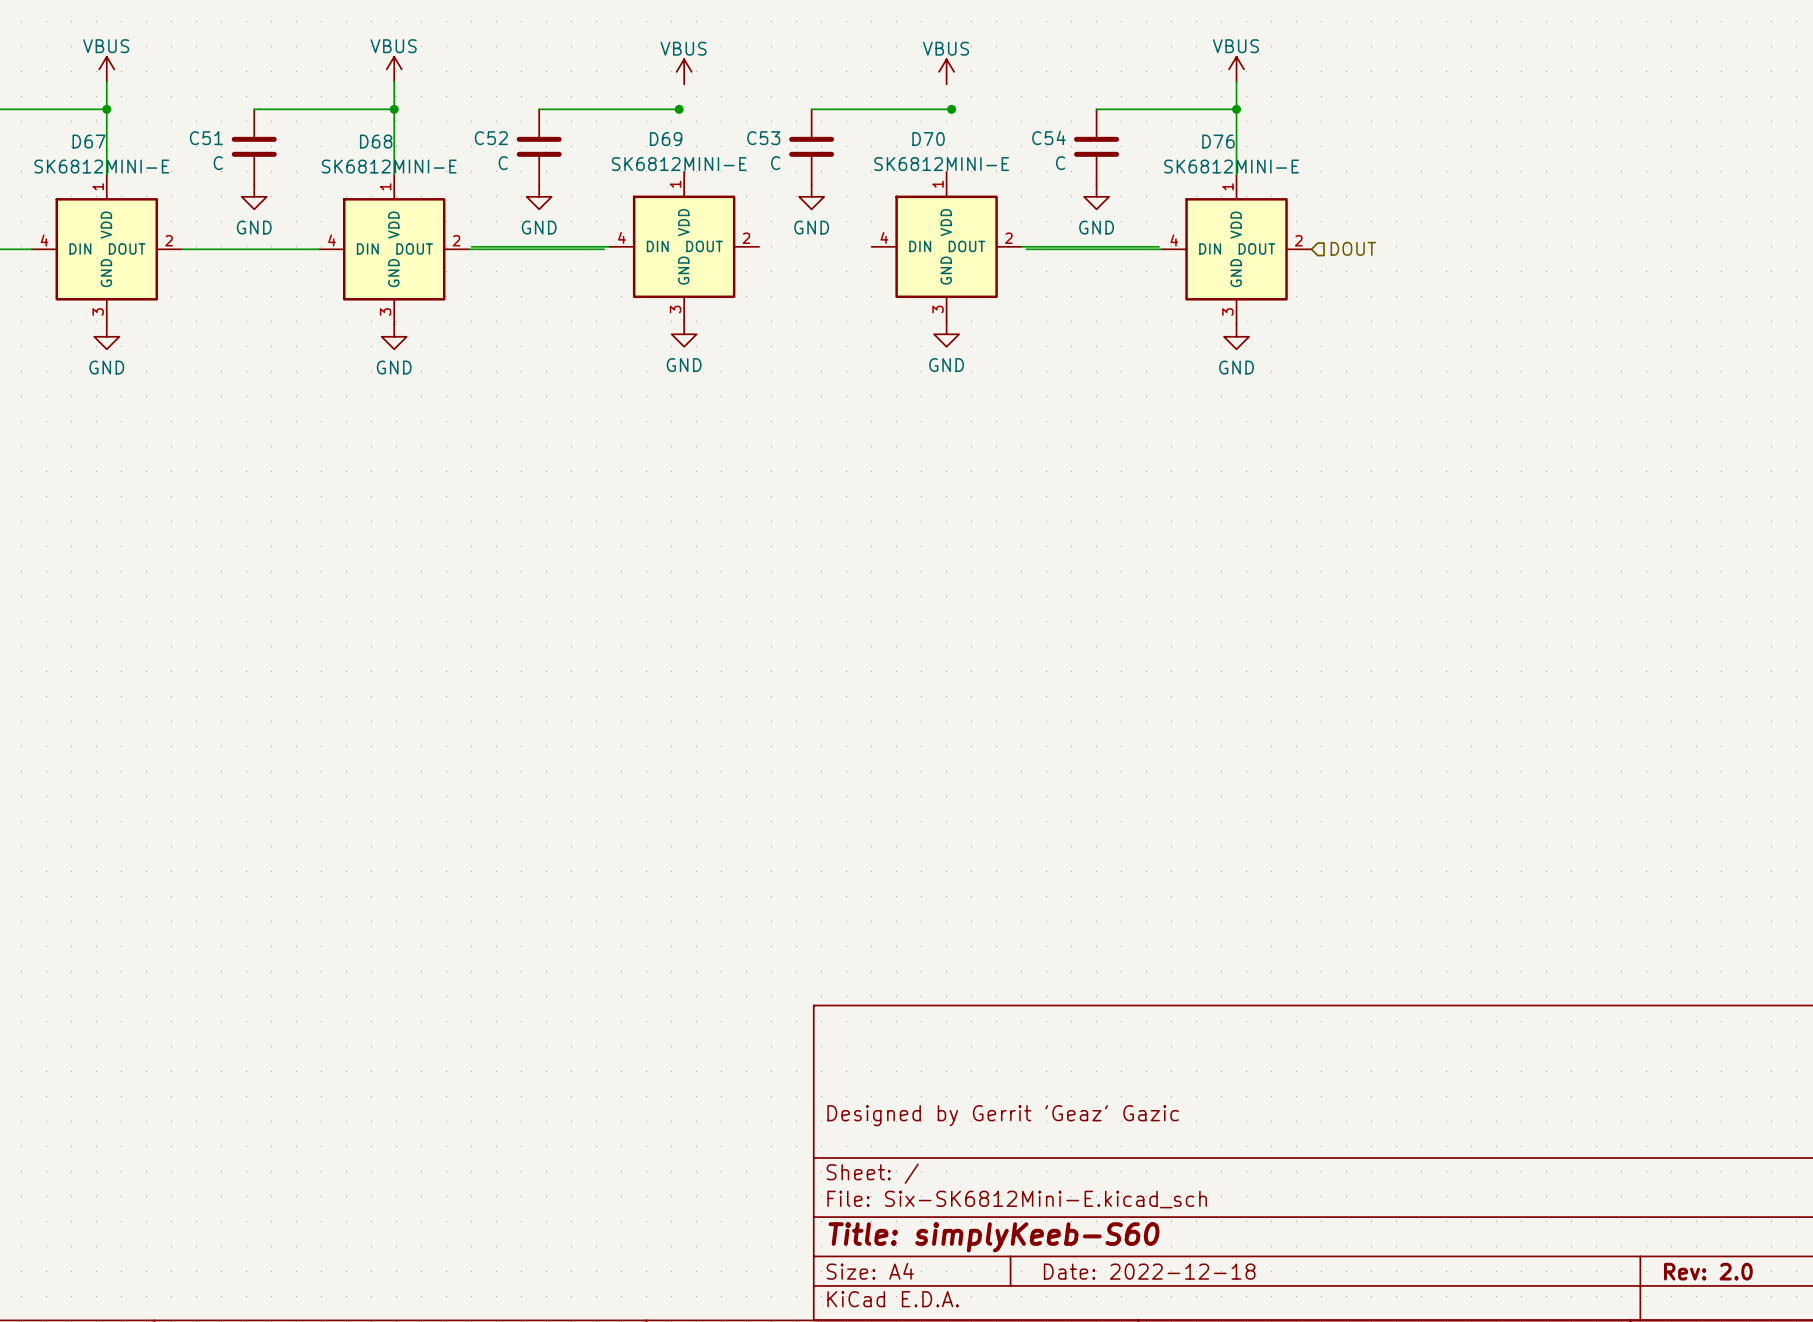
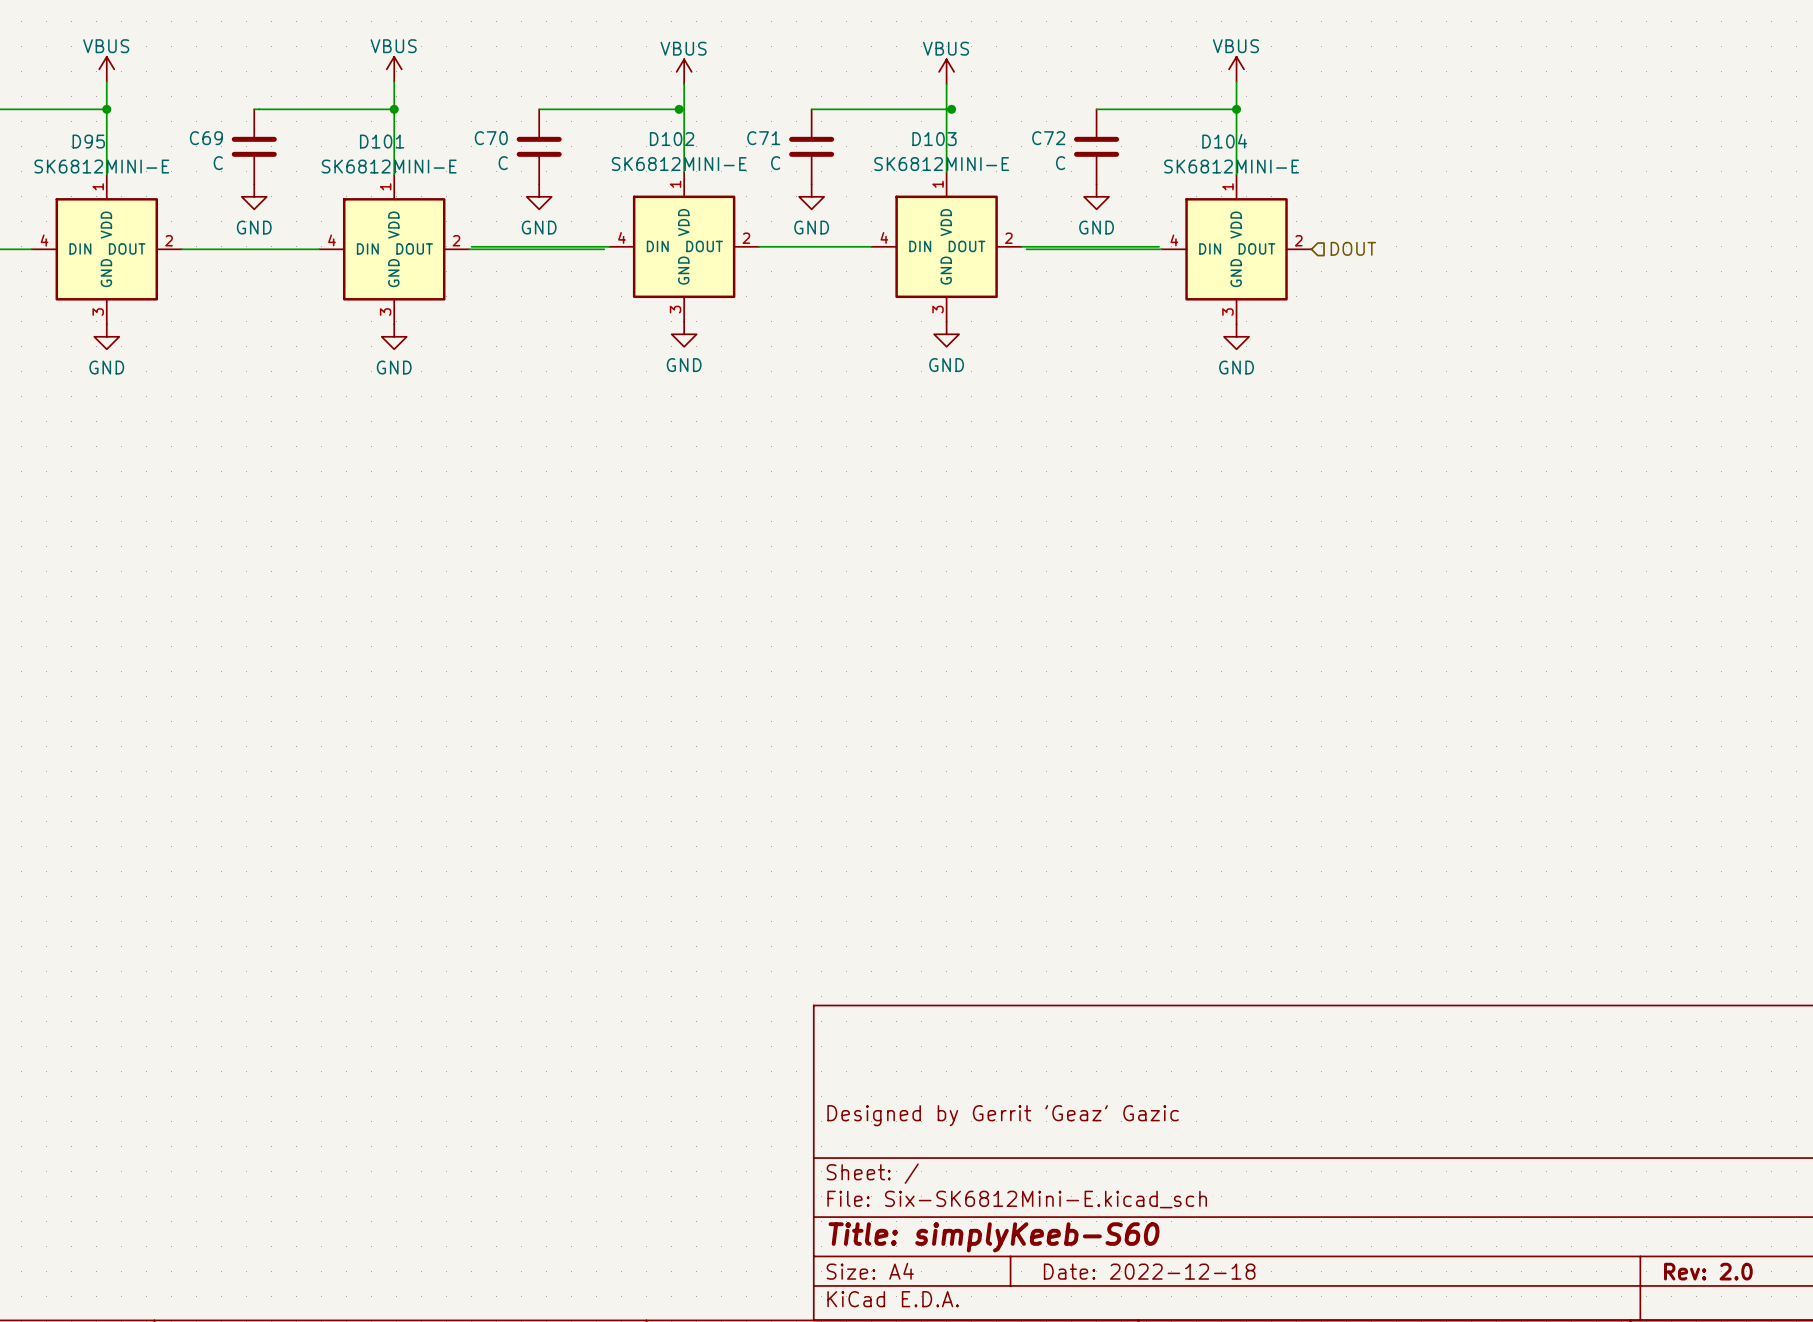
wire: none -> (684, 84) (684, 171)
wire: none -> (946, 84) (946, 171)
C54 name: C54 (1048, 137) -> C72 (1048, 138)
C51 name: C51 (206, 138) -> C69 (206, 138)
C52 name: C52 (491, 138) -> C70 (491, 138)
C53 name: C53 (763, 138) -> C71 (763, 138)
D69 name: D69 (666, 139) -> D102 (672, 139)
D70 name: D70 (928, 139) -> D103 (934, 139)
D67 name: D67 (89, 141) -> D95 (88, 141)
D68 name: D68 (376, 141) -> D101 (382, 141)
D76 name: D76 (1218, 141) -> D104 (1224, 141)
wire: none -> (759, 246) (871, 246)

